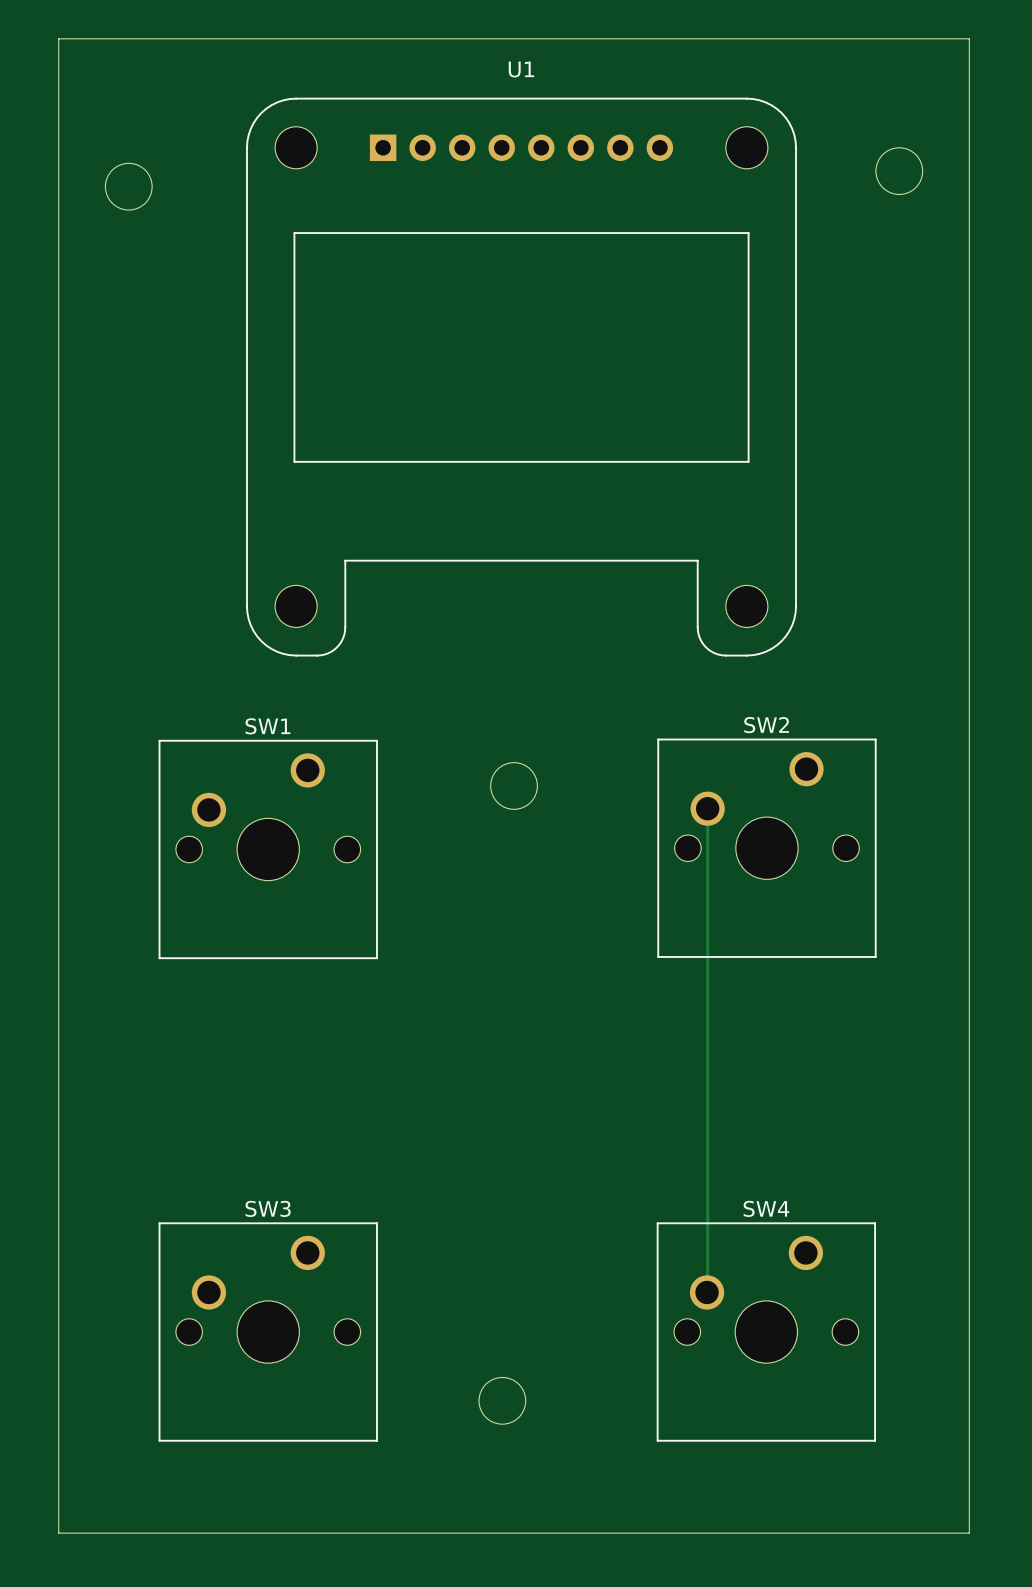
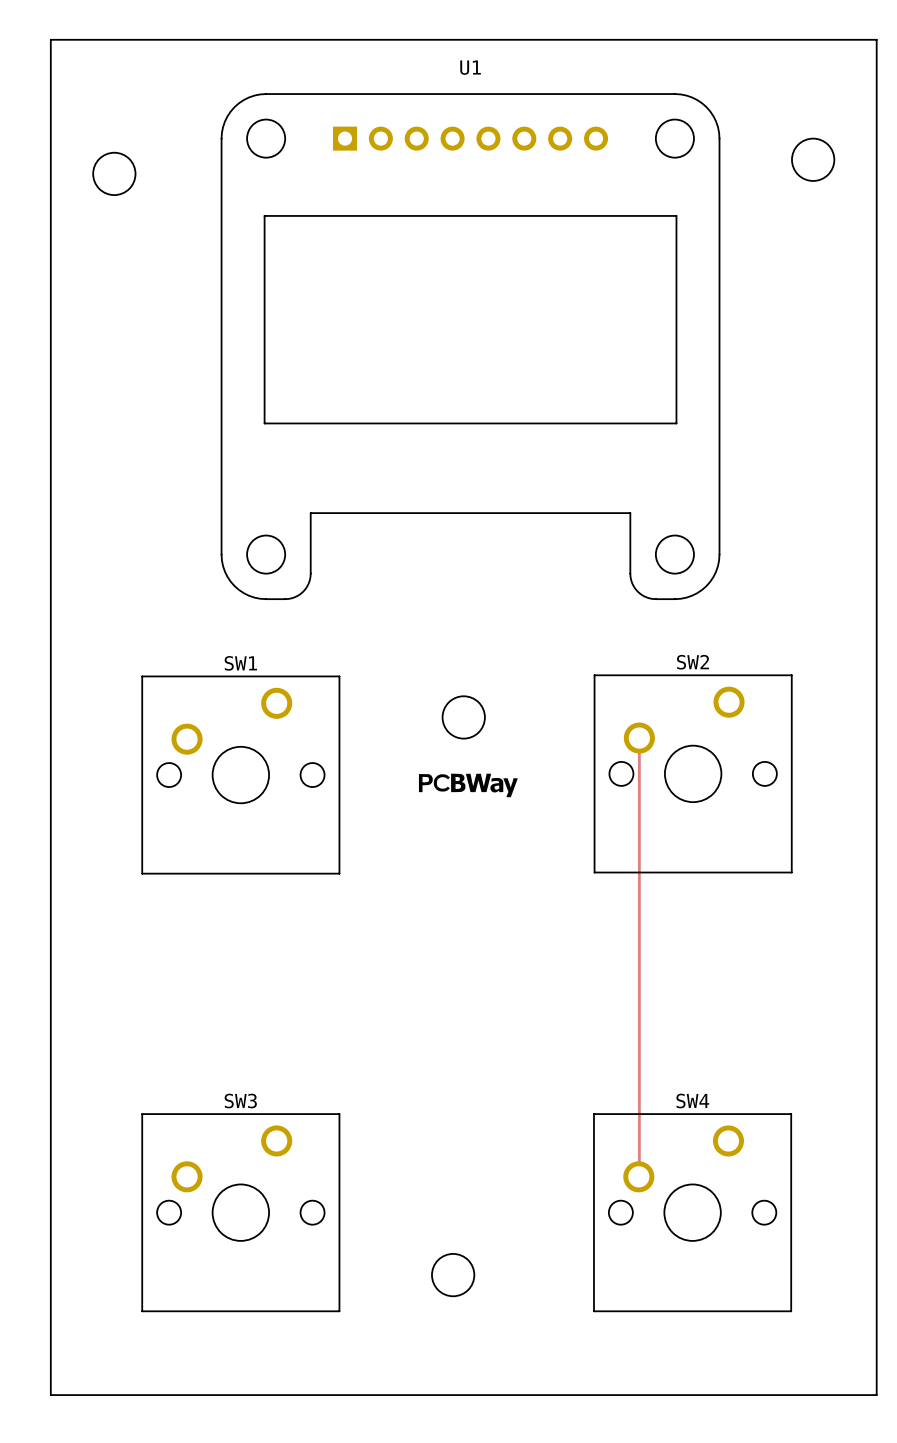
drawing: none -> [418, 773, 518, 798]

